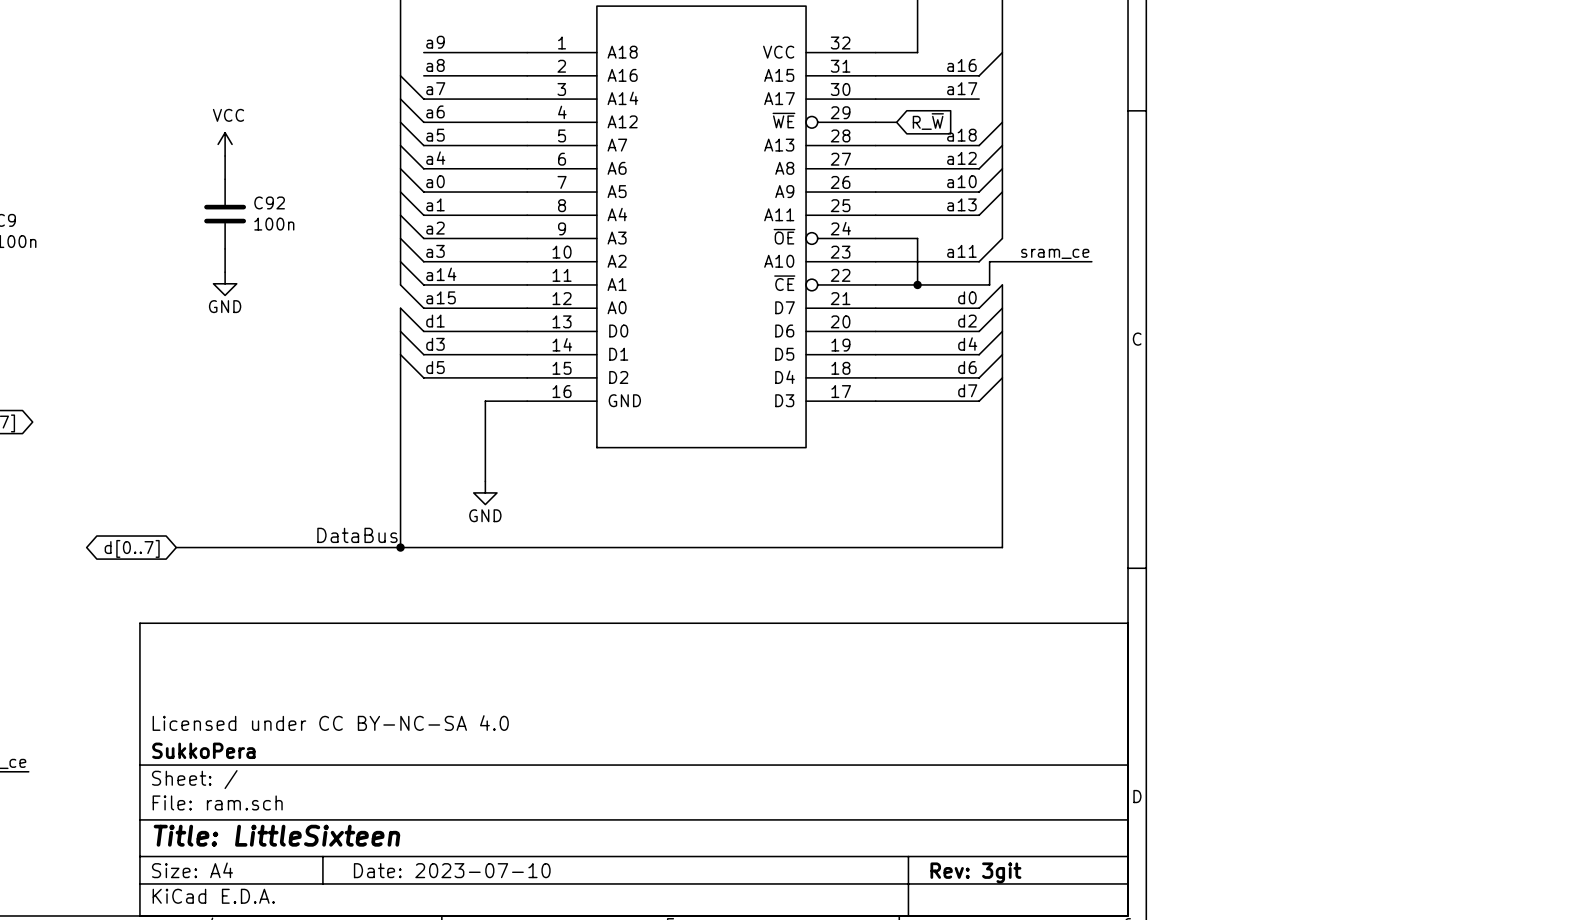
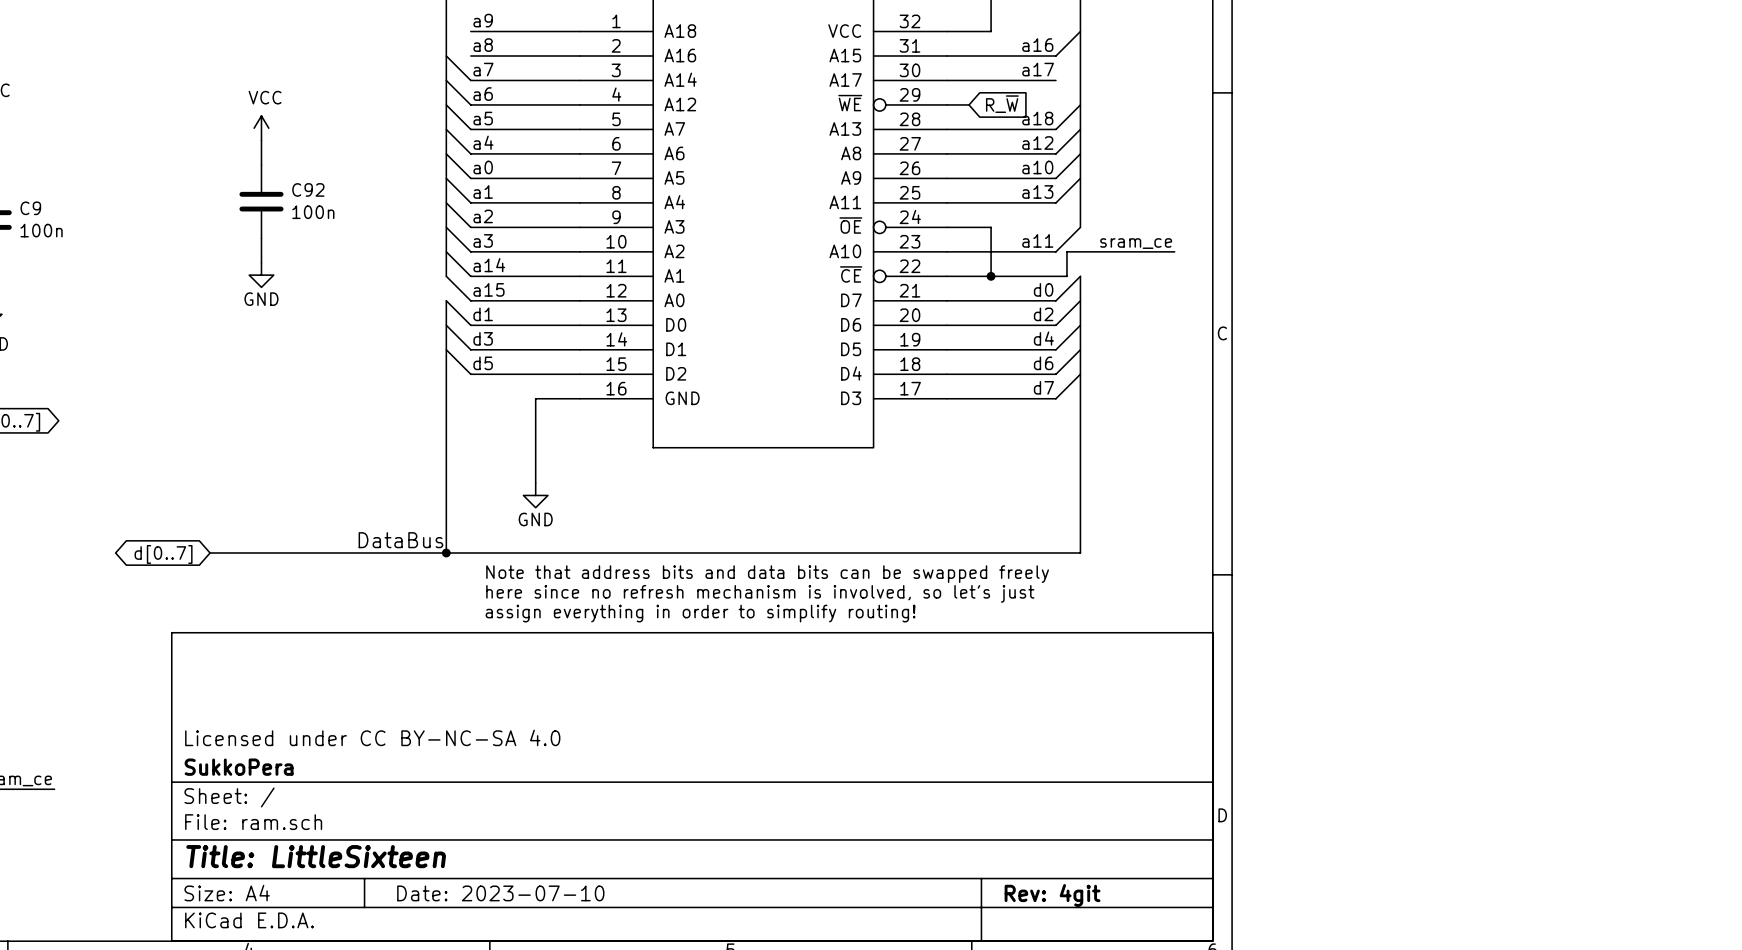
text: none -> Note that address bits and data bits can be swapped freely (767, 574)
text: none -> here since no refresh mechanism is involved, so let's just (760, 593)
text: none -> assign everything in order to simplify routing! (700, 613)
title block: Rev: 3git (975, 872) -> Rev: 4git (1052, 895)

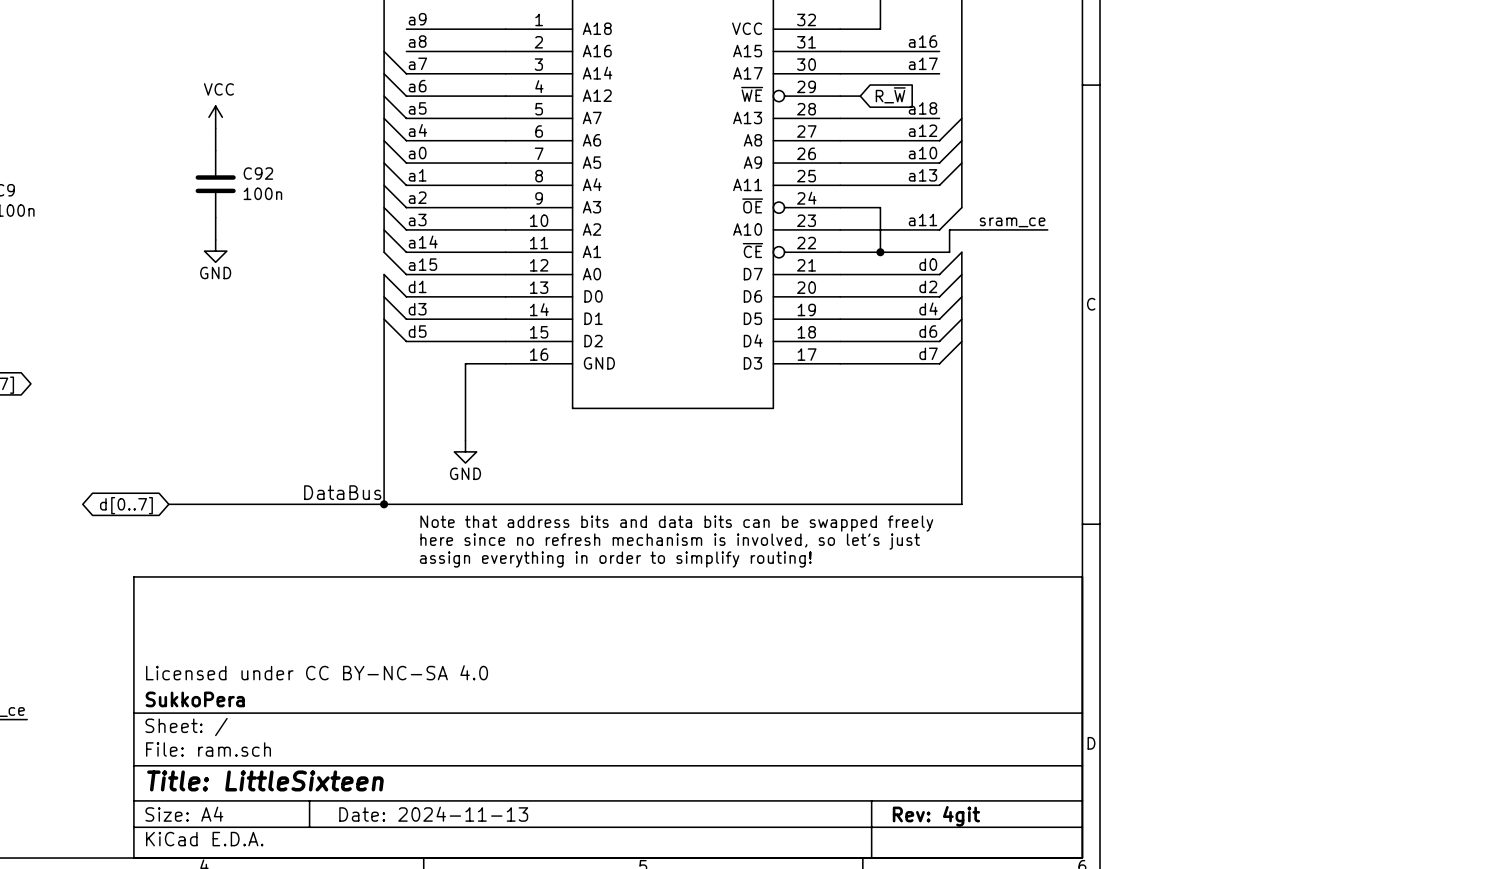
wire: (1080, 31) (1055, 56) -> none
wire: (1080, 104) (1055, 129) -> none
title block: Date: 2023-07-10 (500, 893) -> Date: 2024-11-13 (433, 814)

